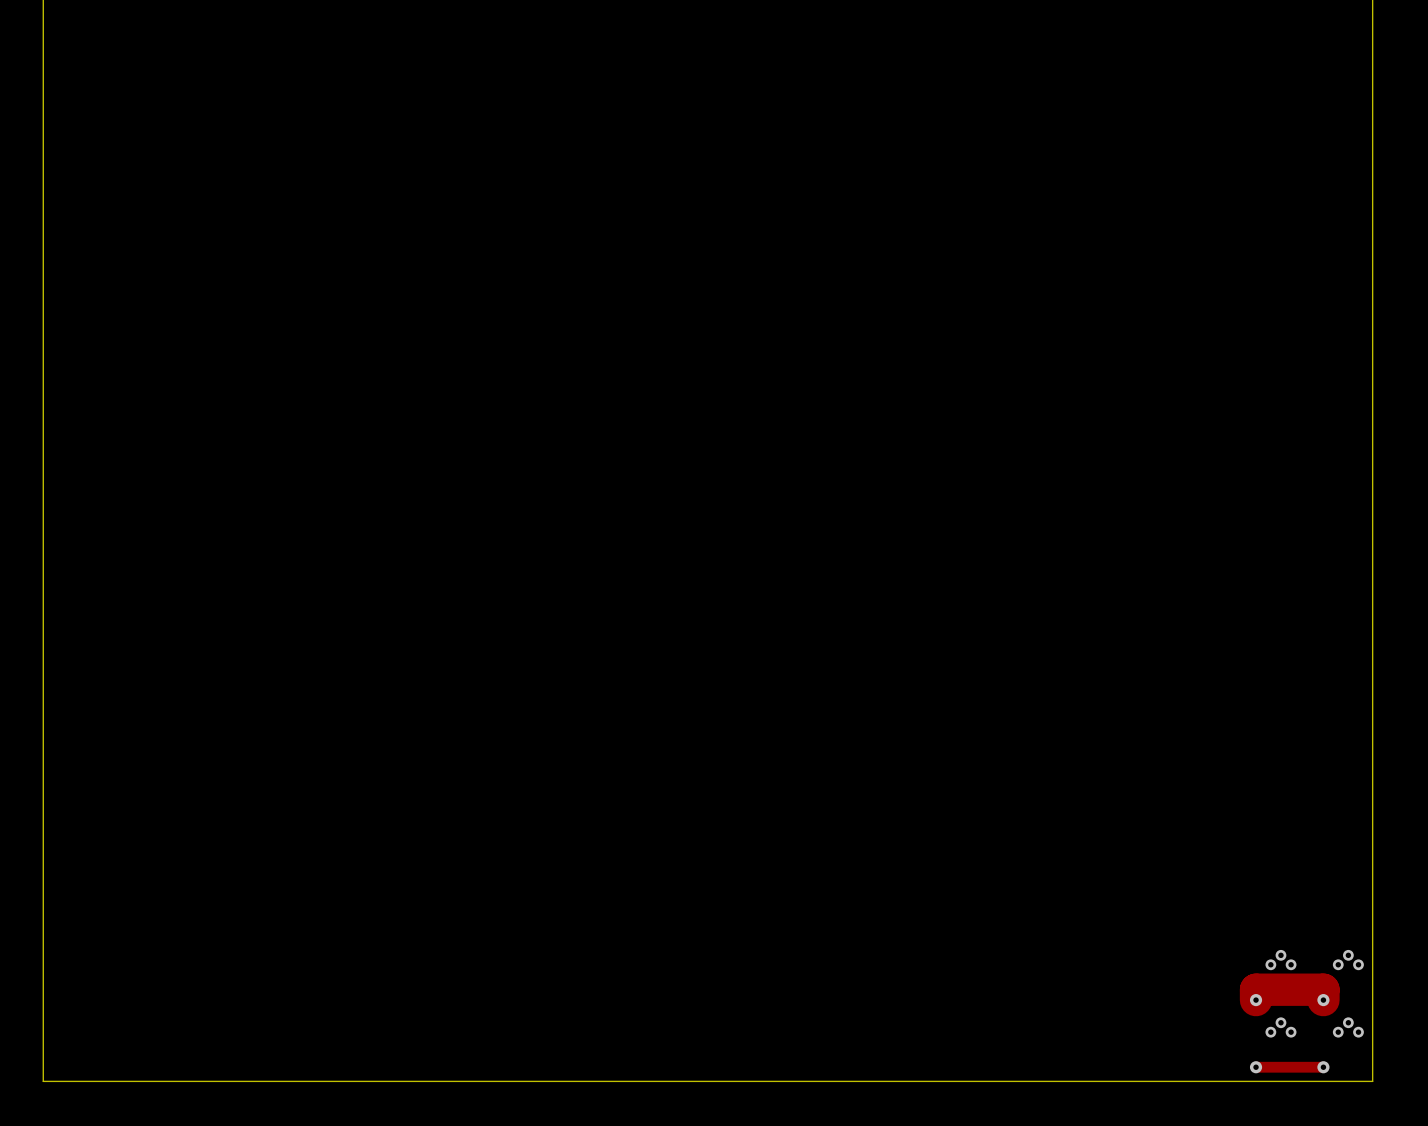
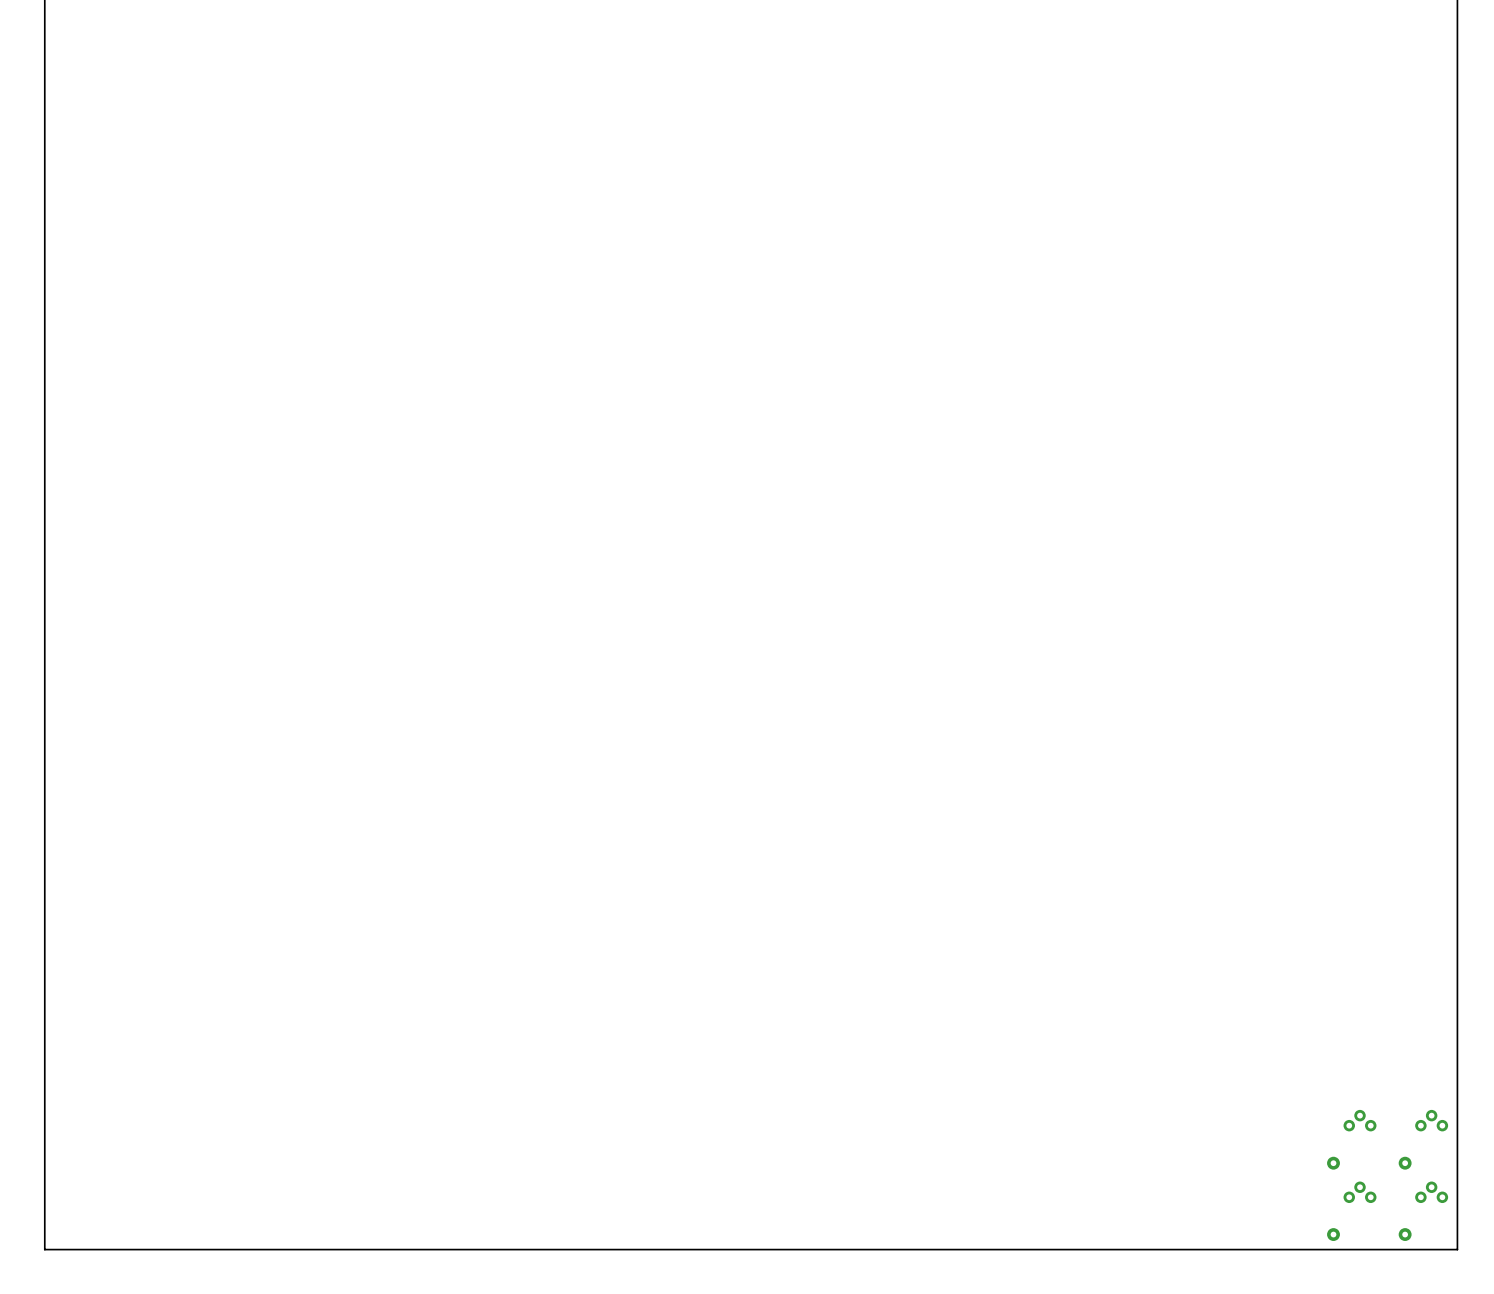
track: (1256, 1000) (1256, 989) (1323, 989) (1323, 1000) -> none
track: (1256, 1067) (1323, 1067) -> none

